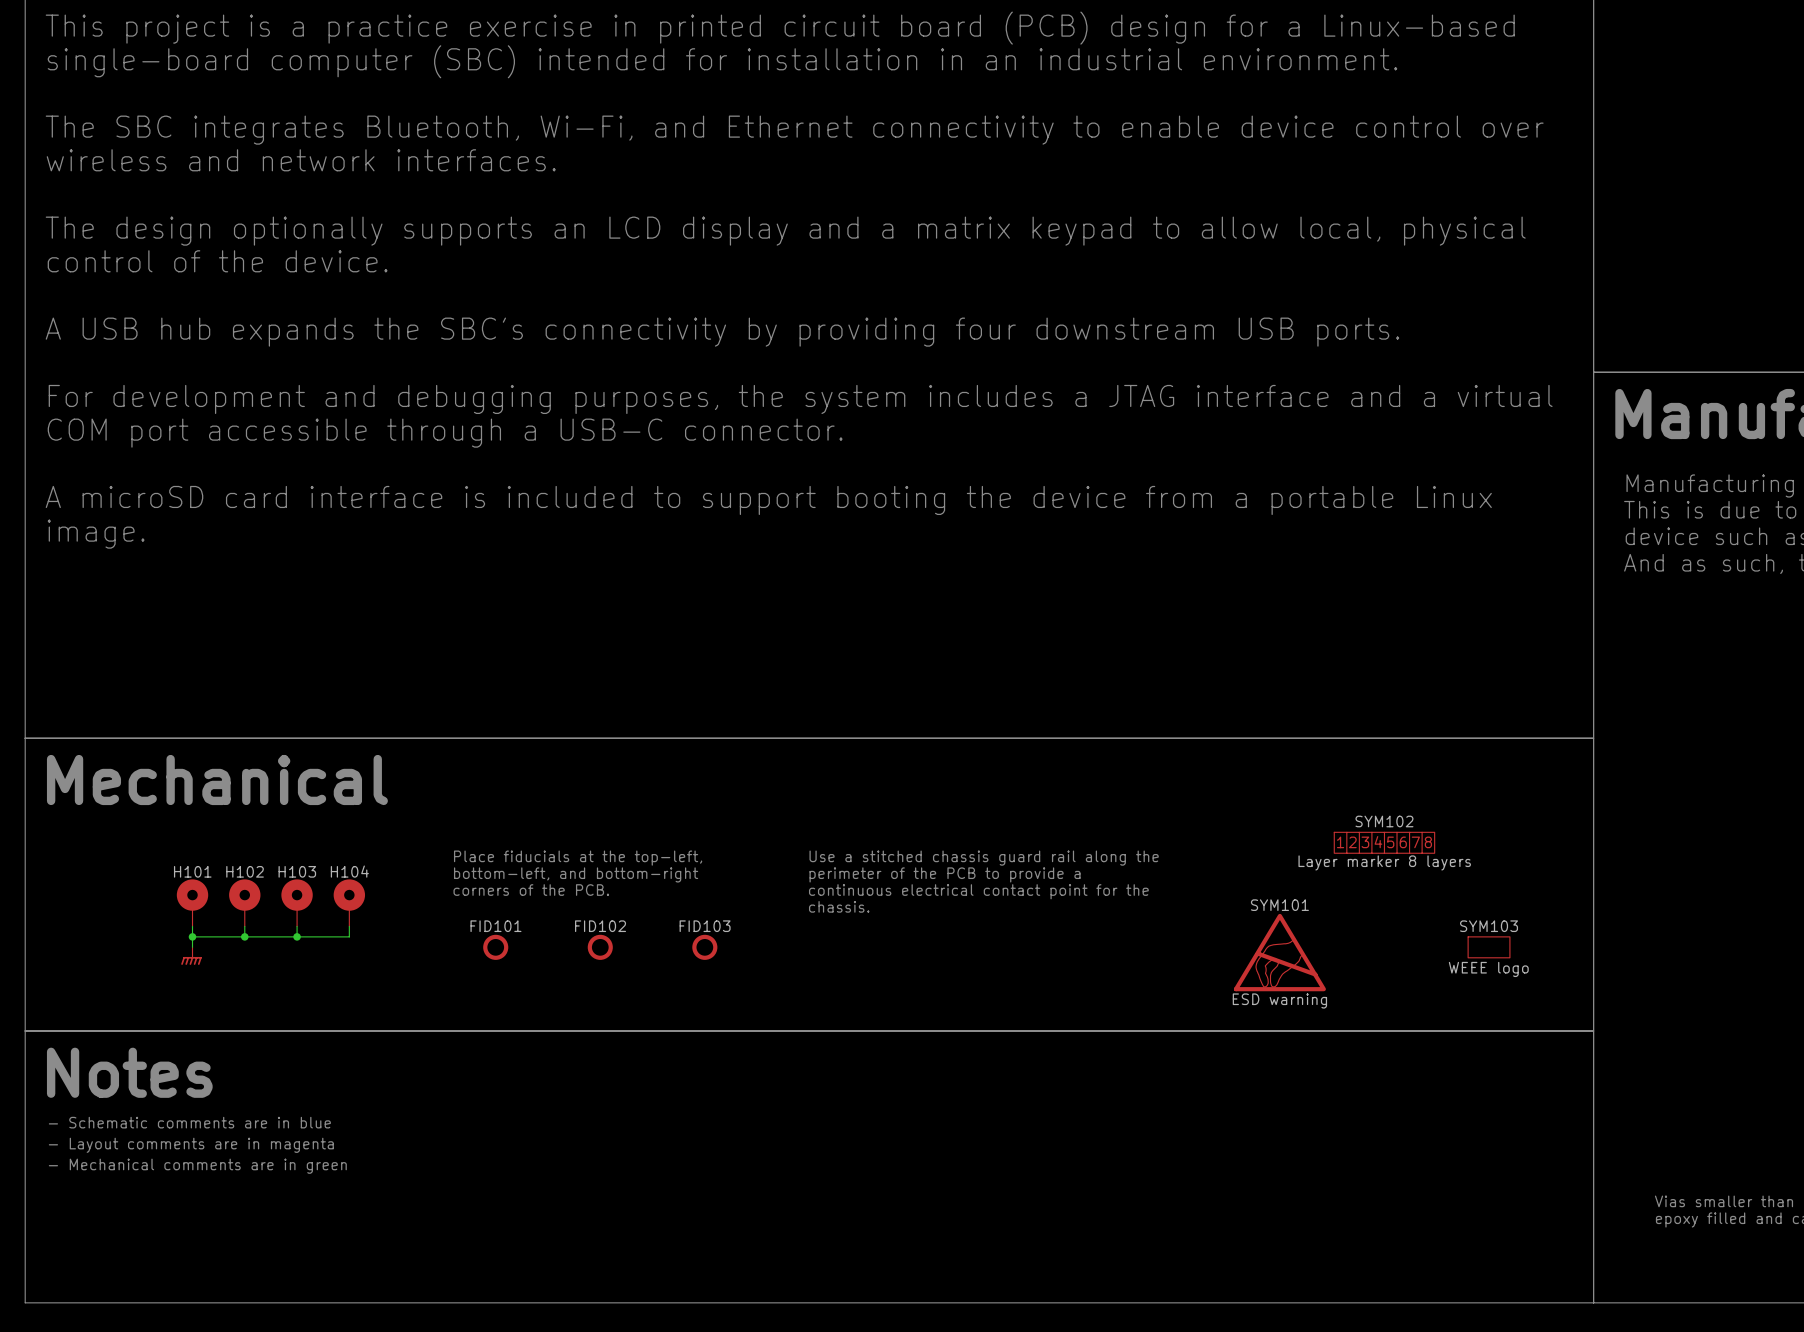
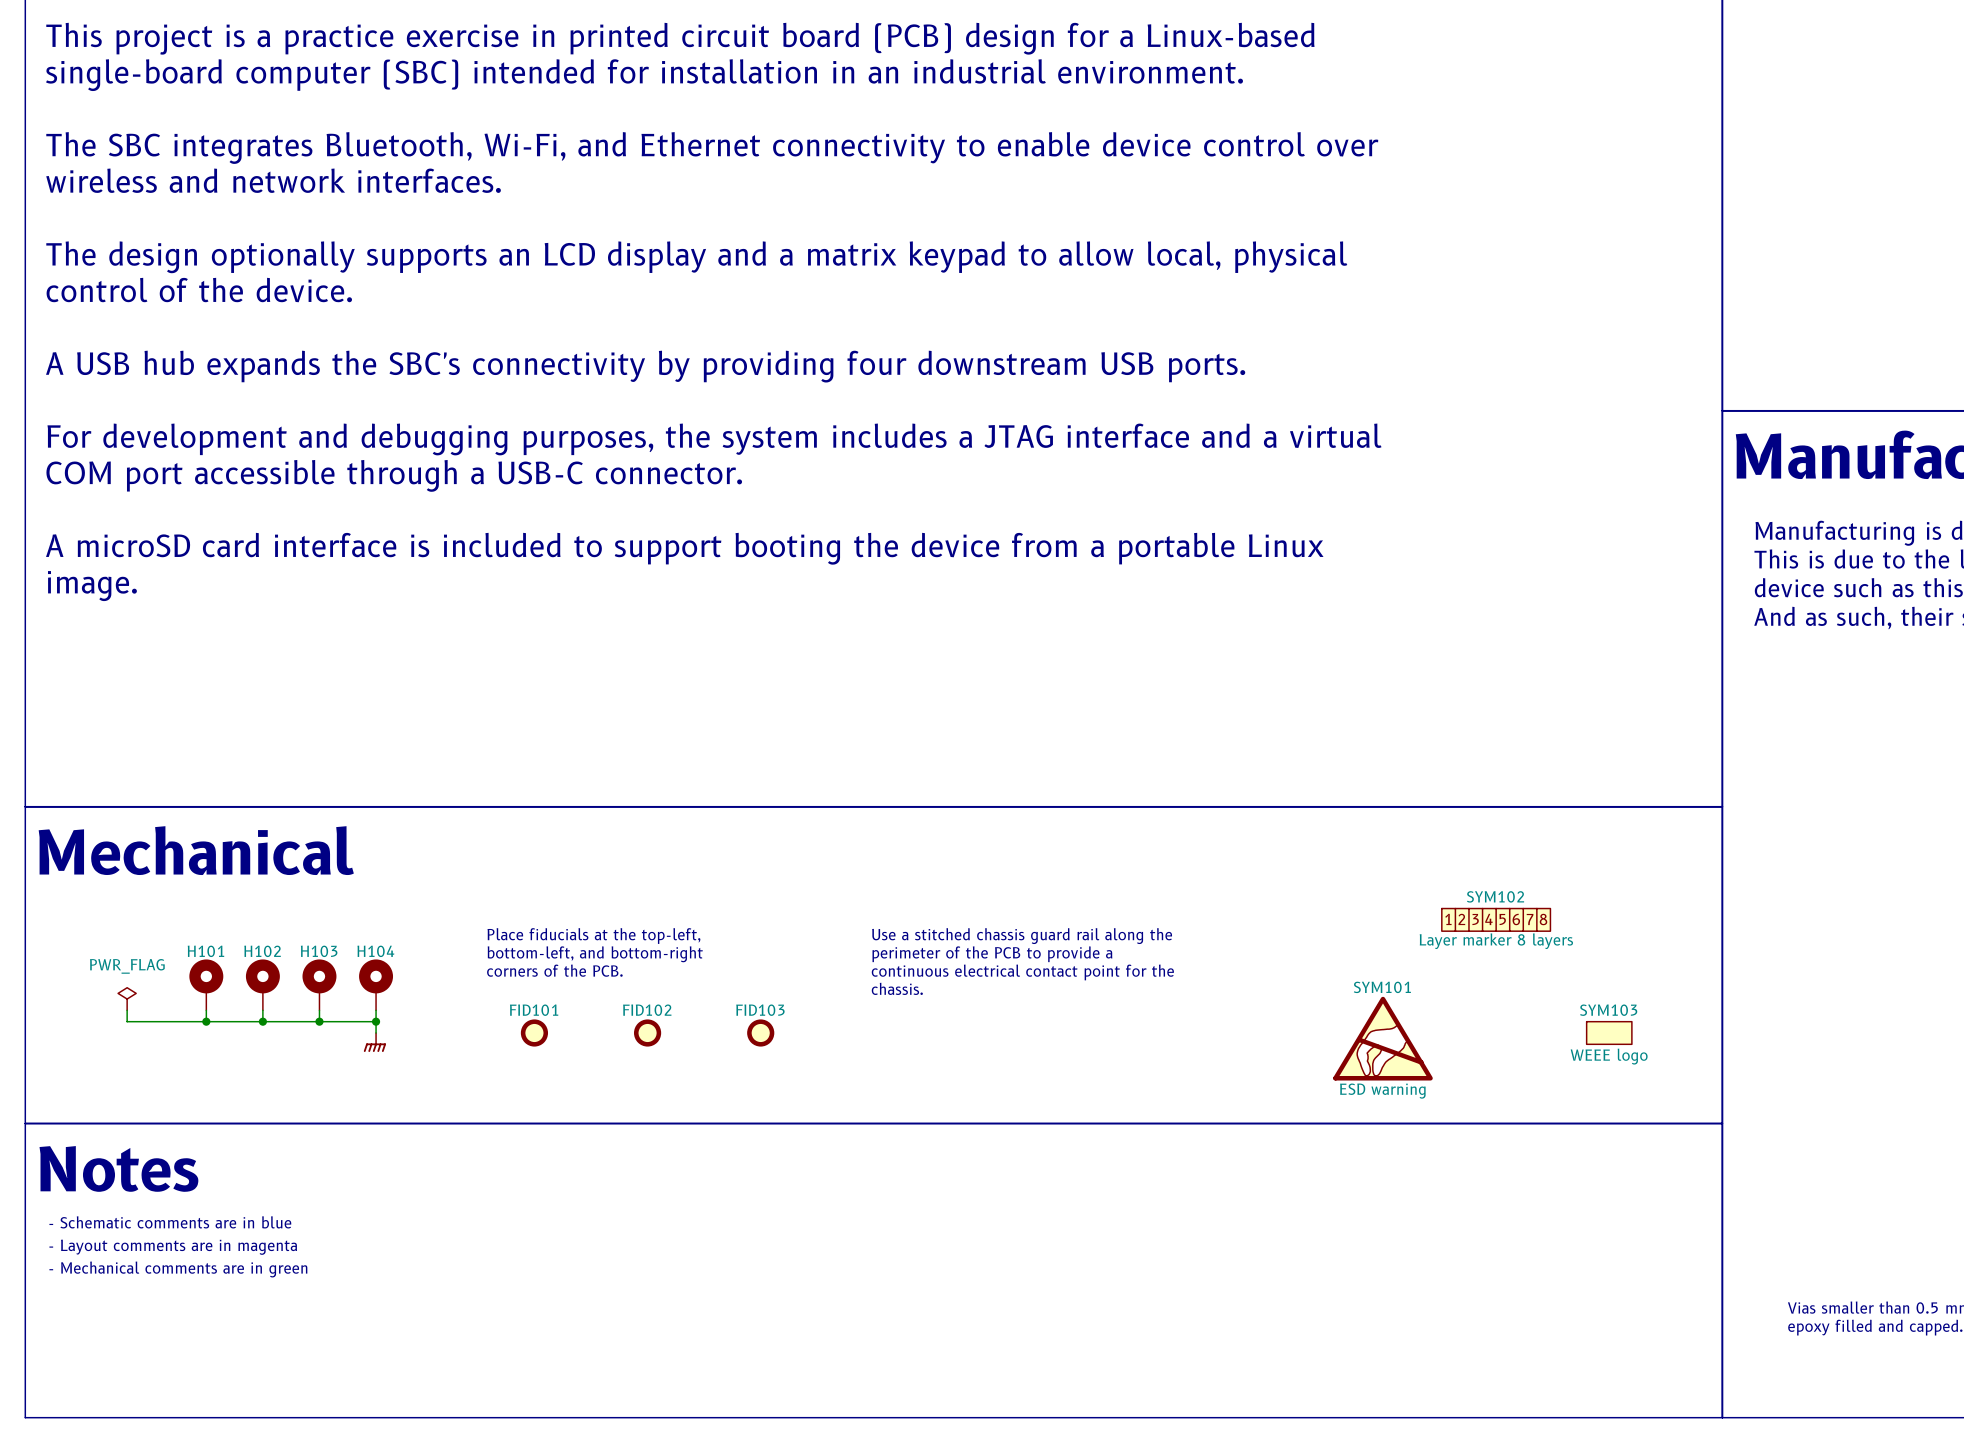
power symbol: none -> PWR_FLAG (127, 999)
wire: (192, 936) (192, 947) -> (206, 1021) (127, 1021) (127, 1010)
wire: none -> (376, 1021) (376, 1033)
junction: none -> (376, 1021)
power symbol position: (191, 956) -> (374, 1042)

